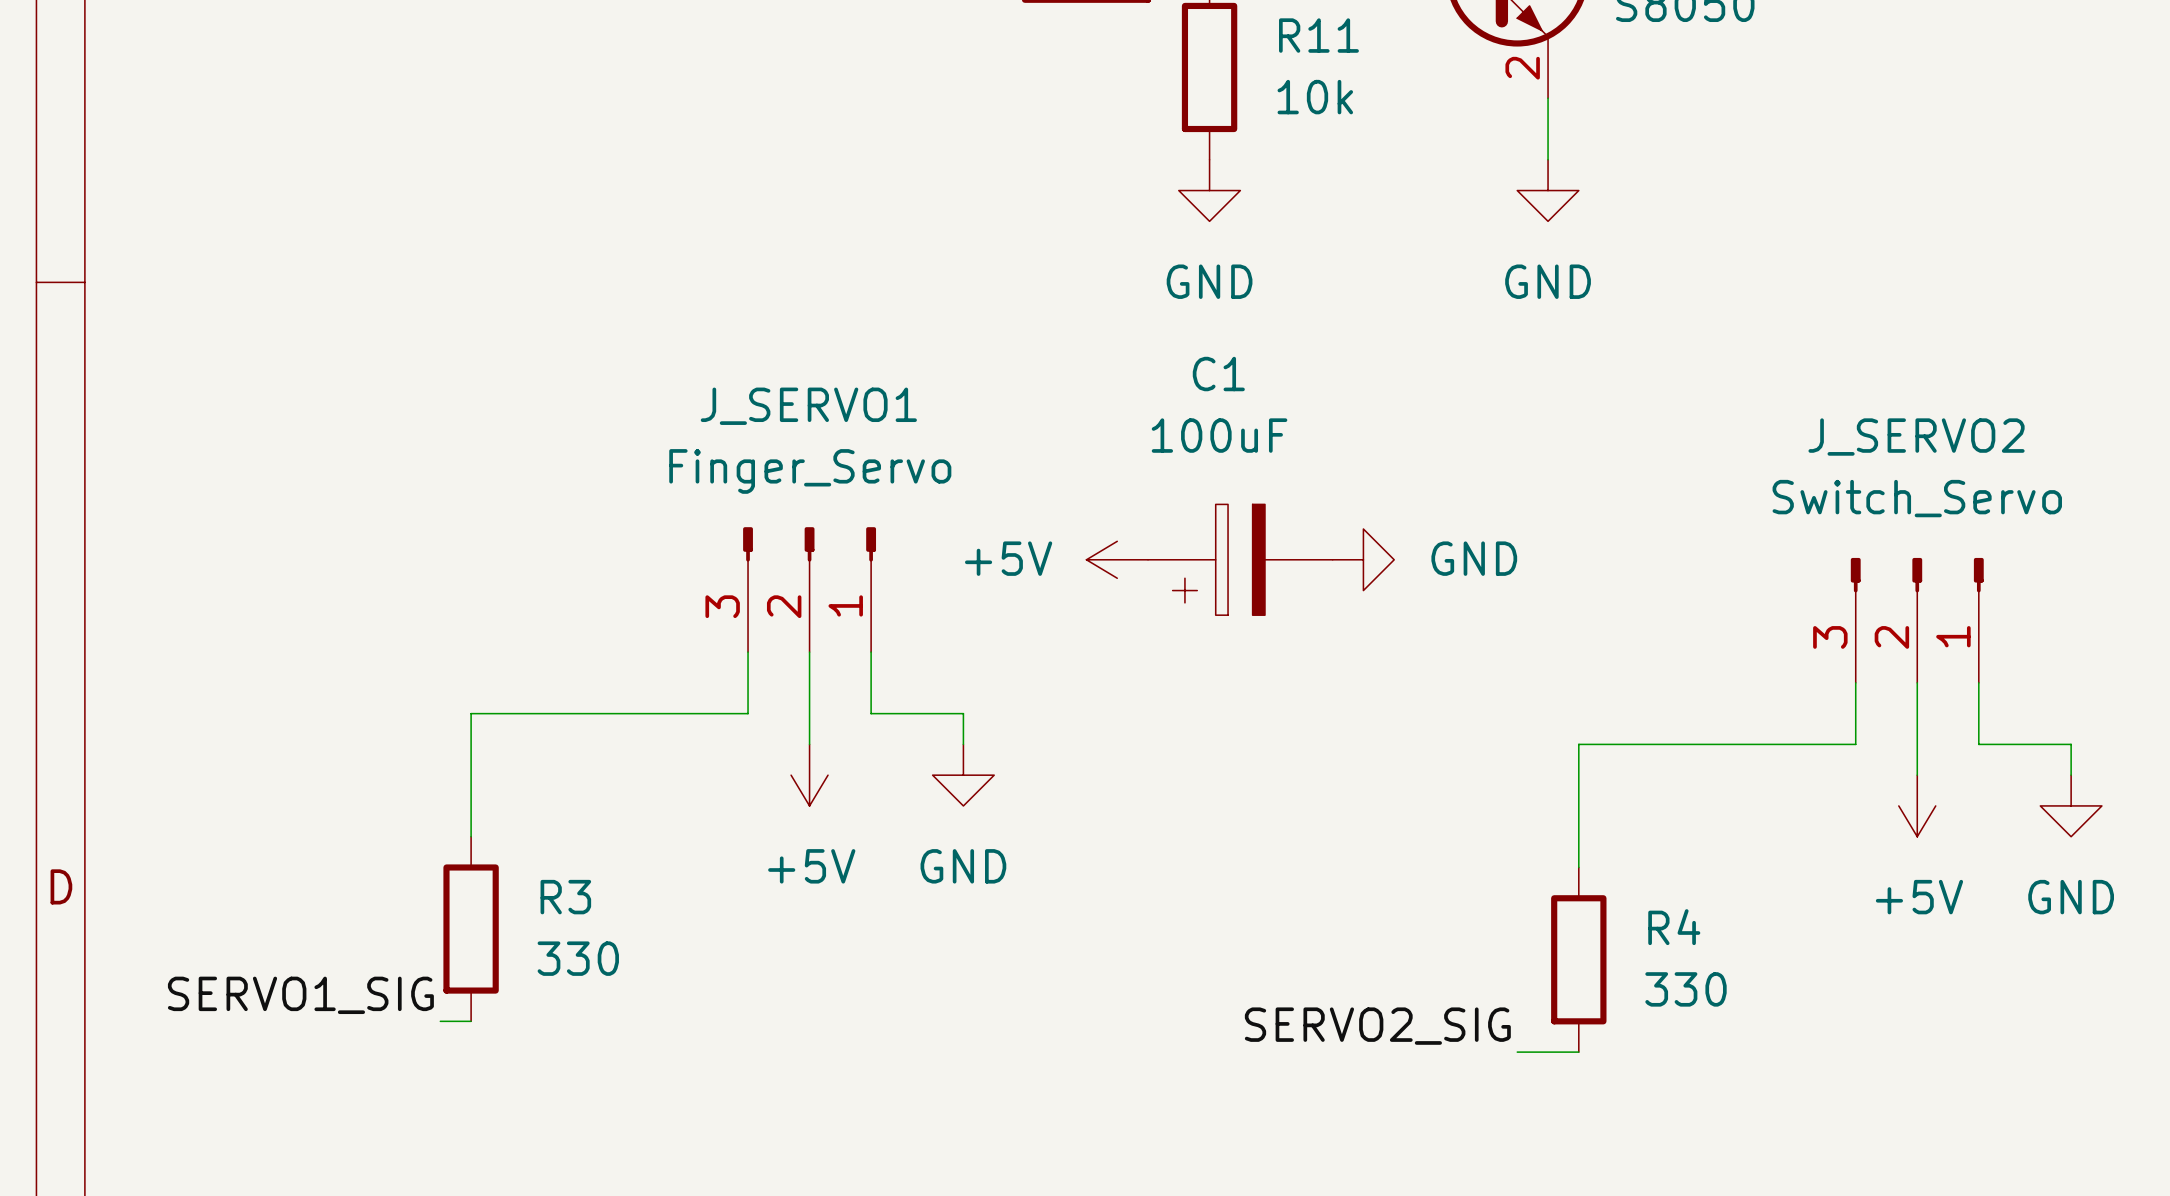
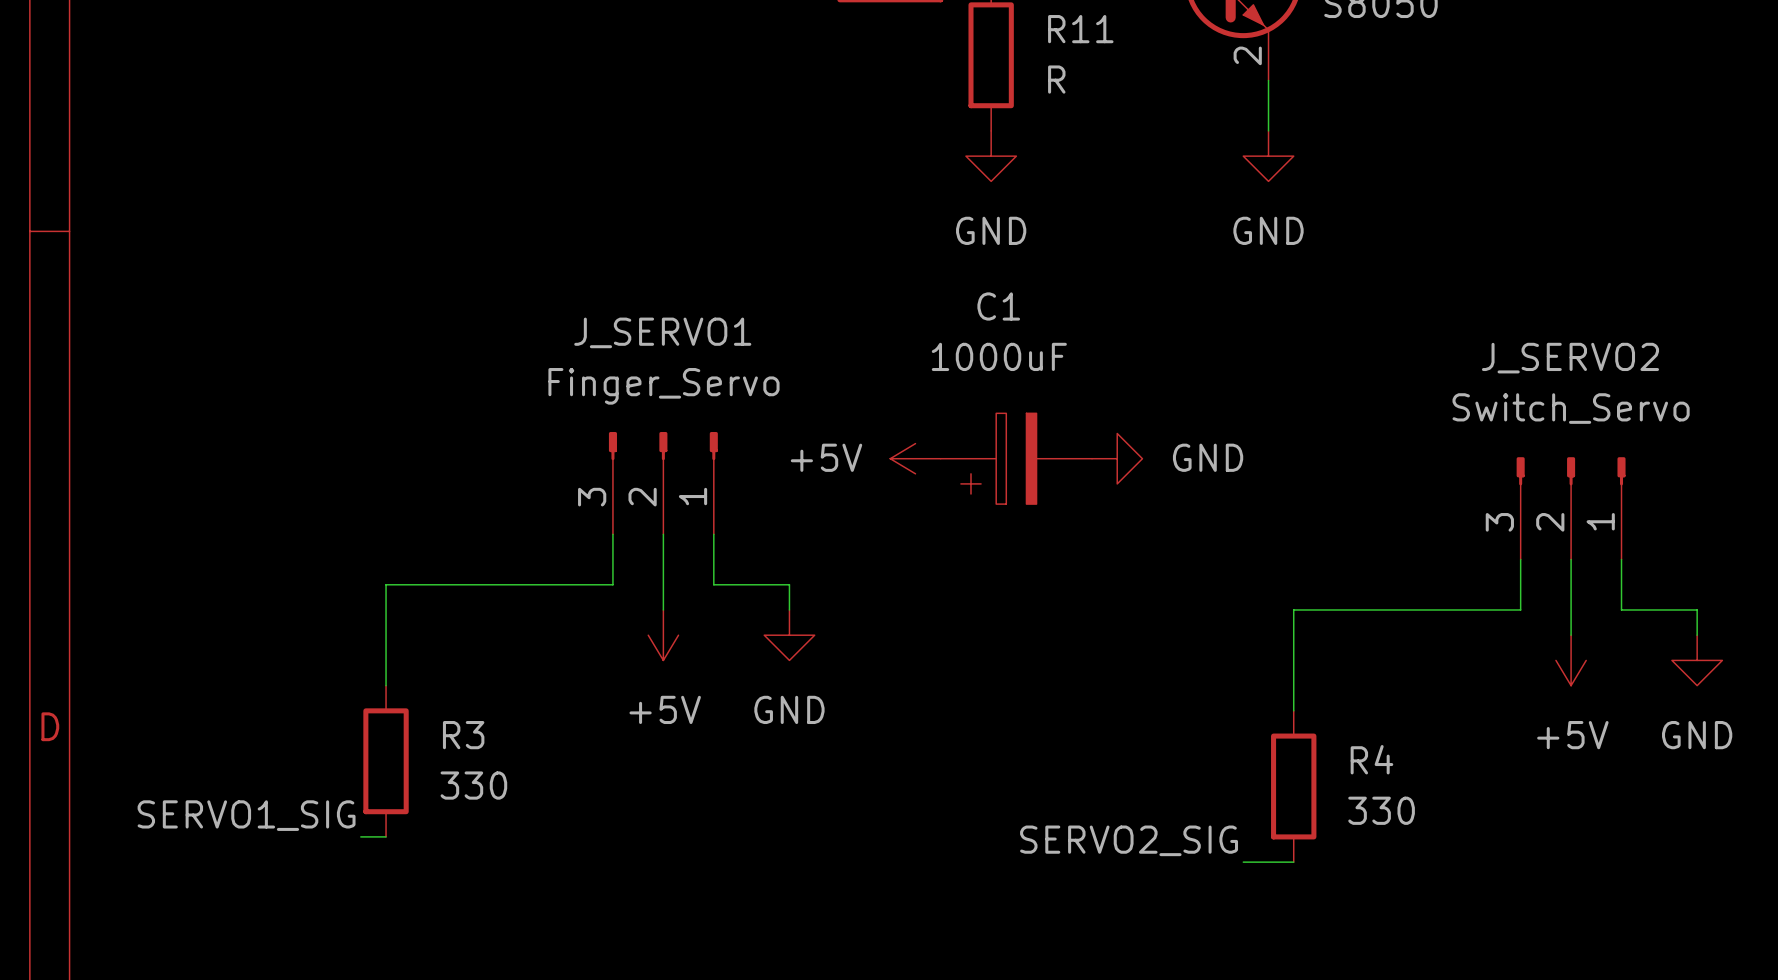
R11 value: 10k (1315, 97) -> R (1056, 79)
C1 value: 100uF (1219, 435) -> 1000uF (999, 356)

